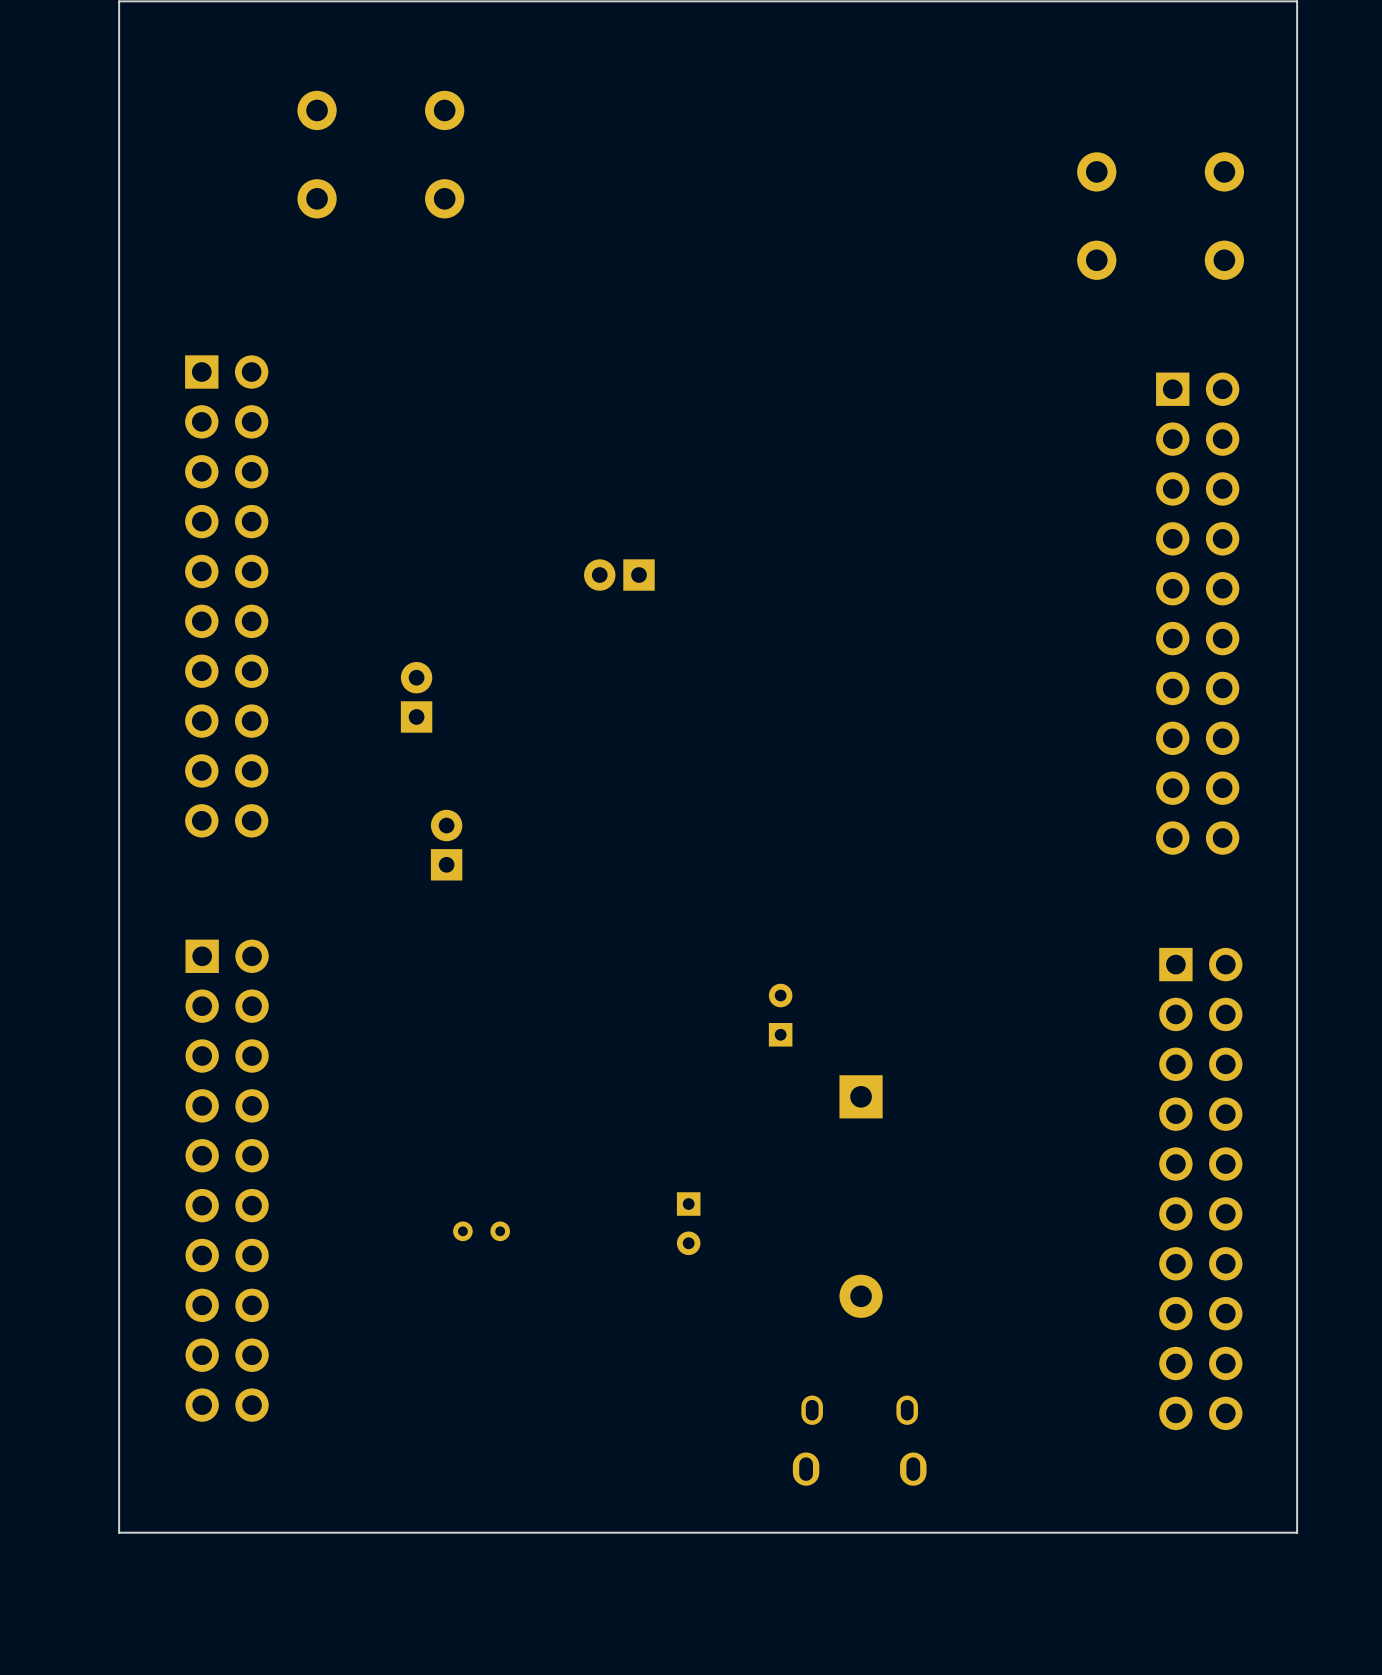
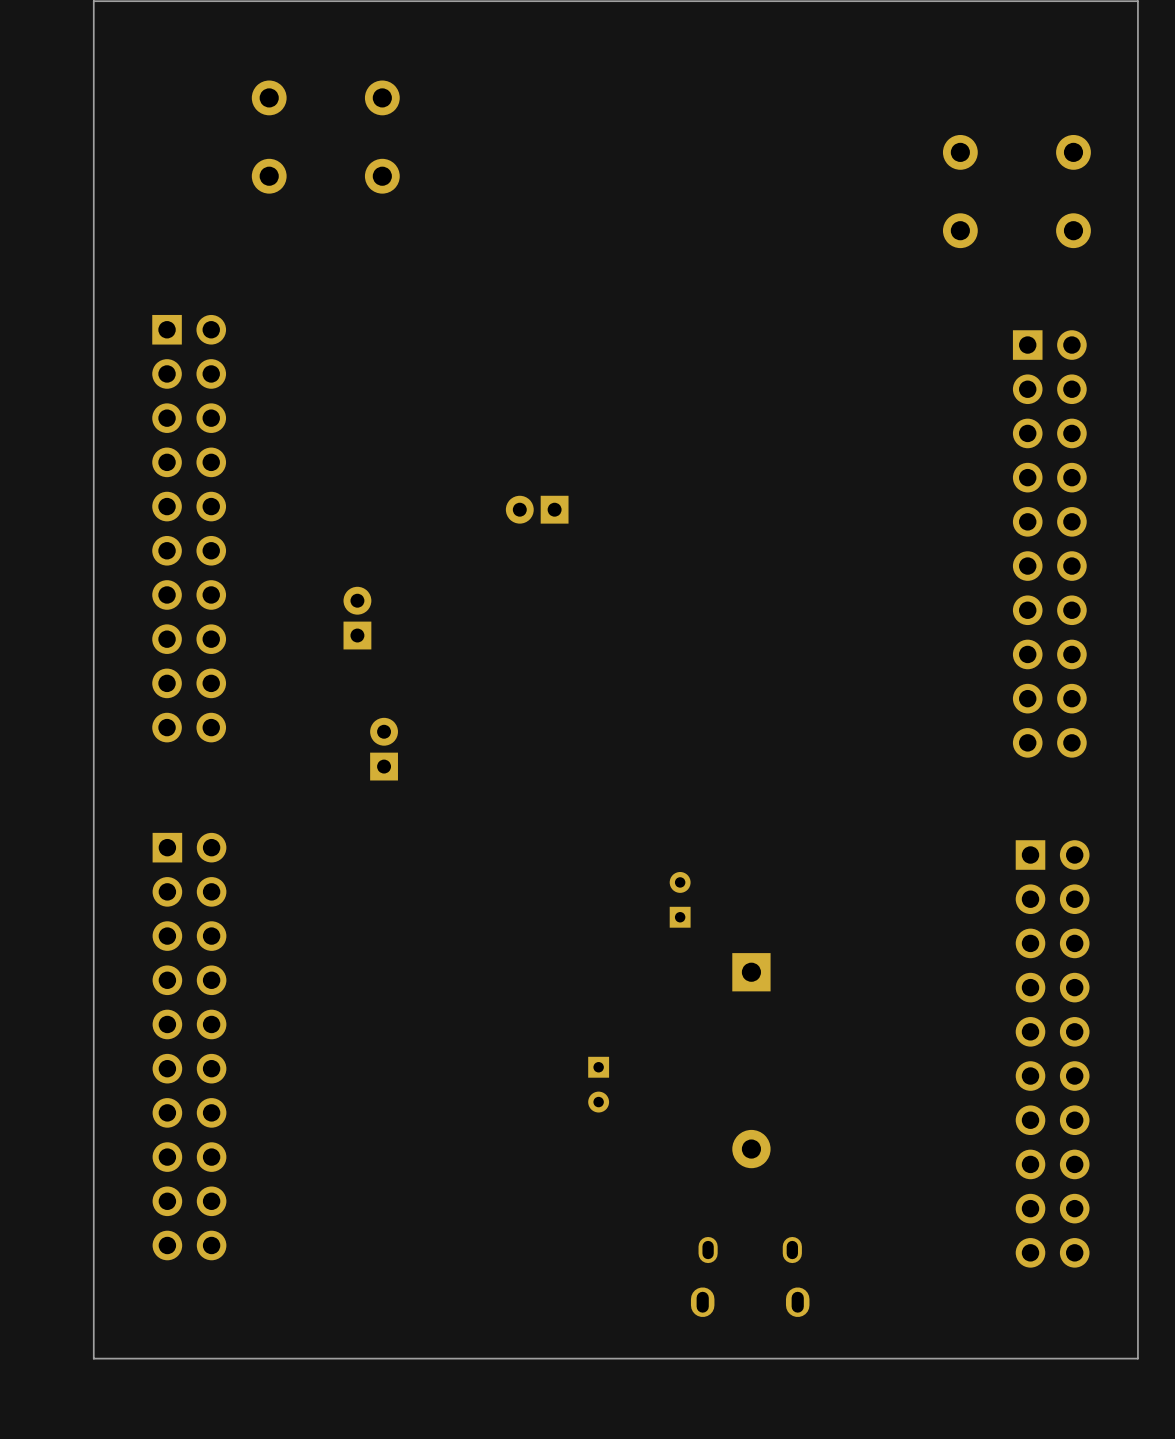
part: (481, 1231) -> none

